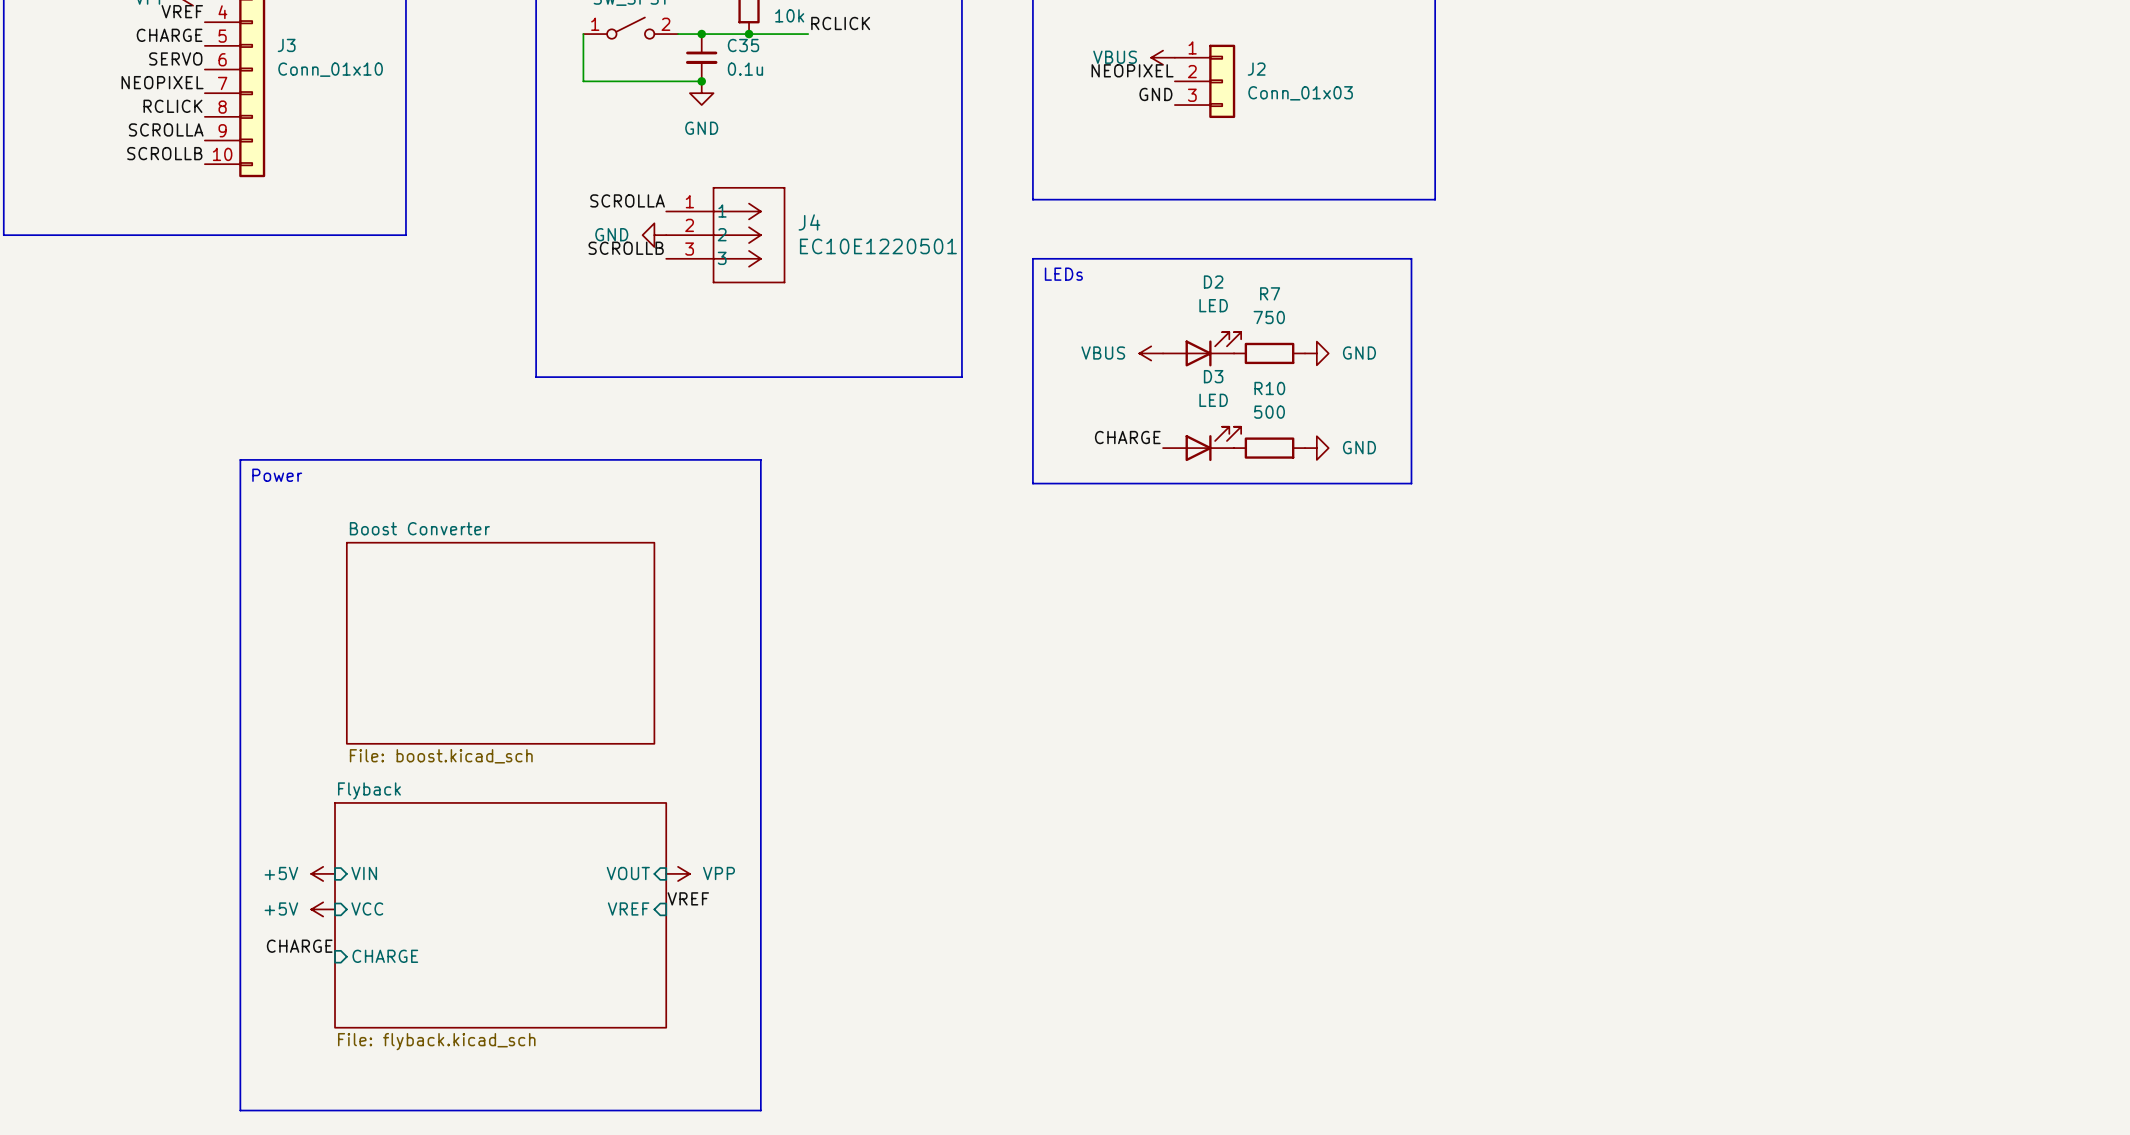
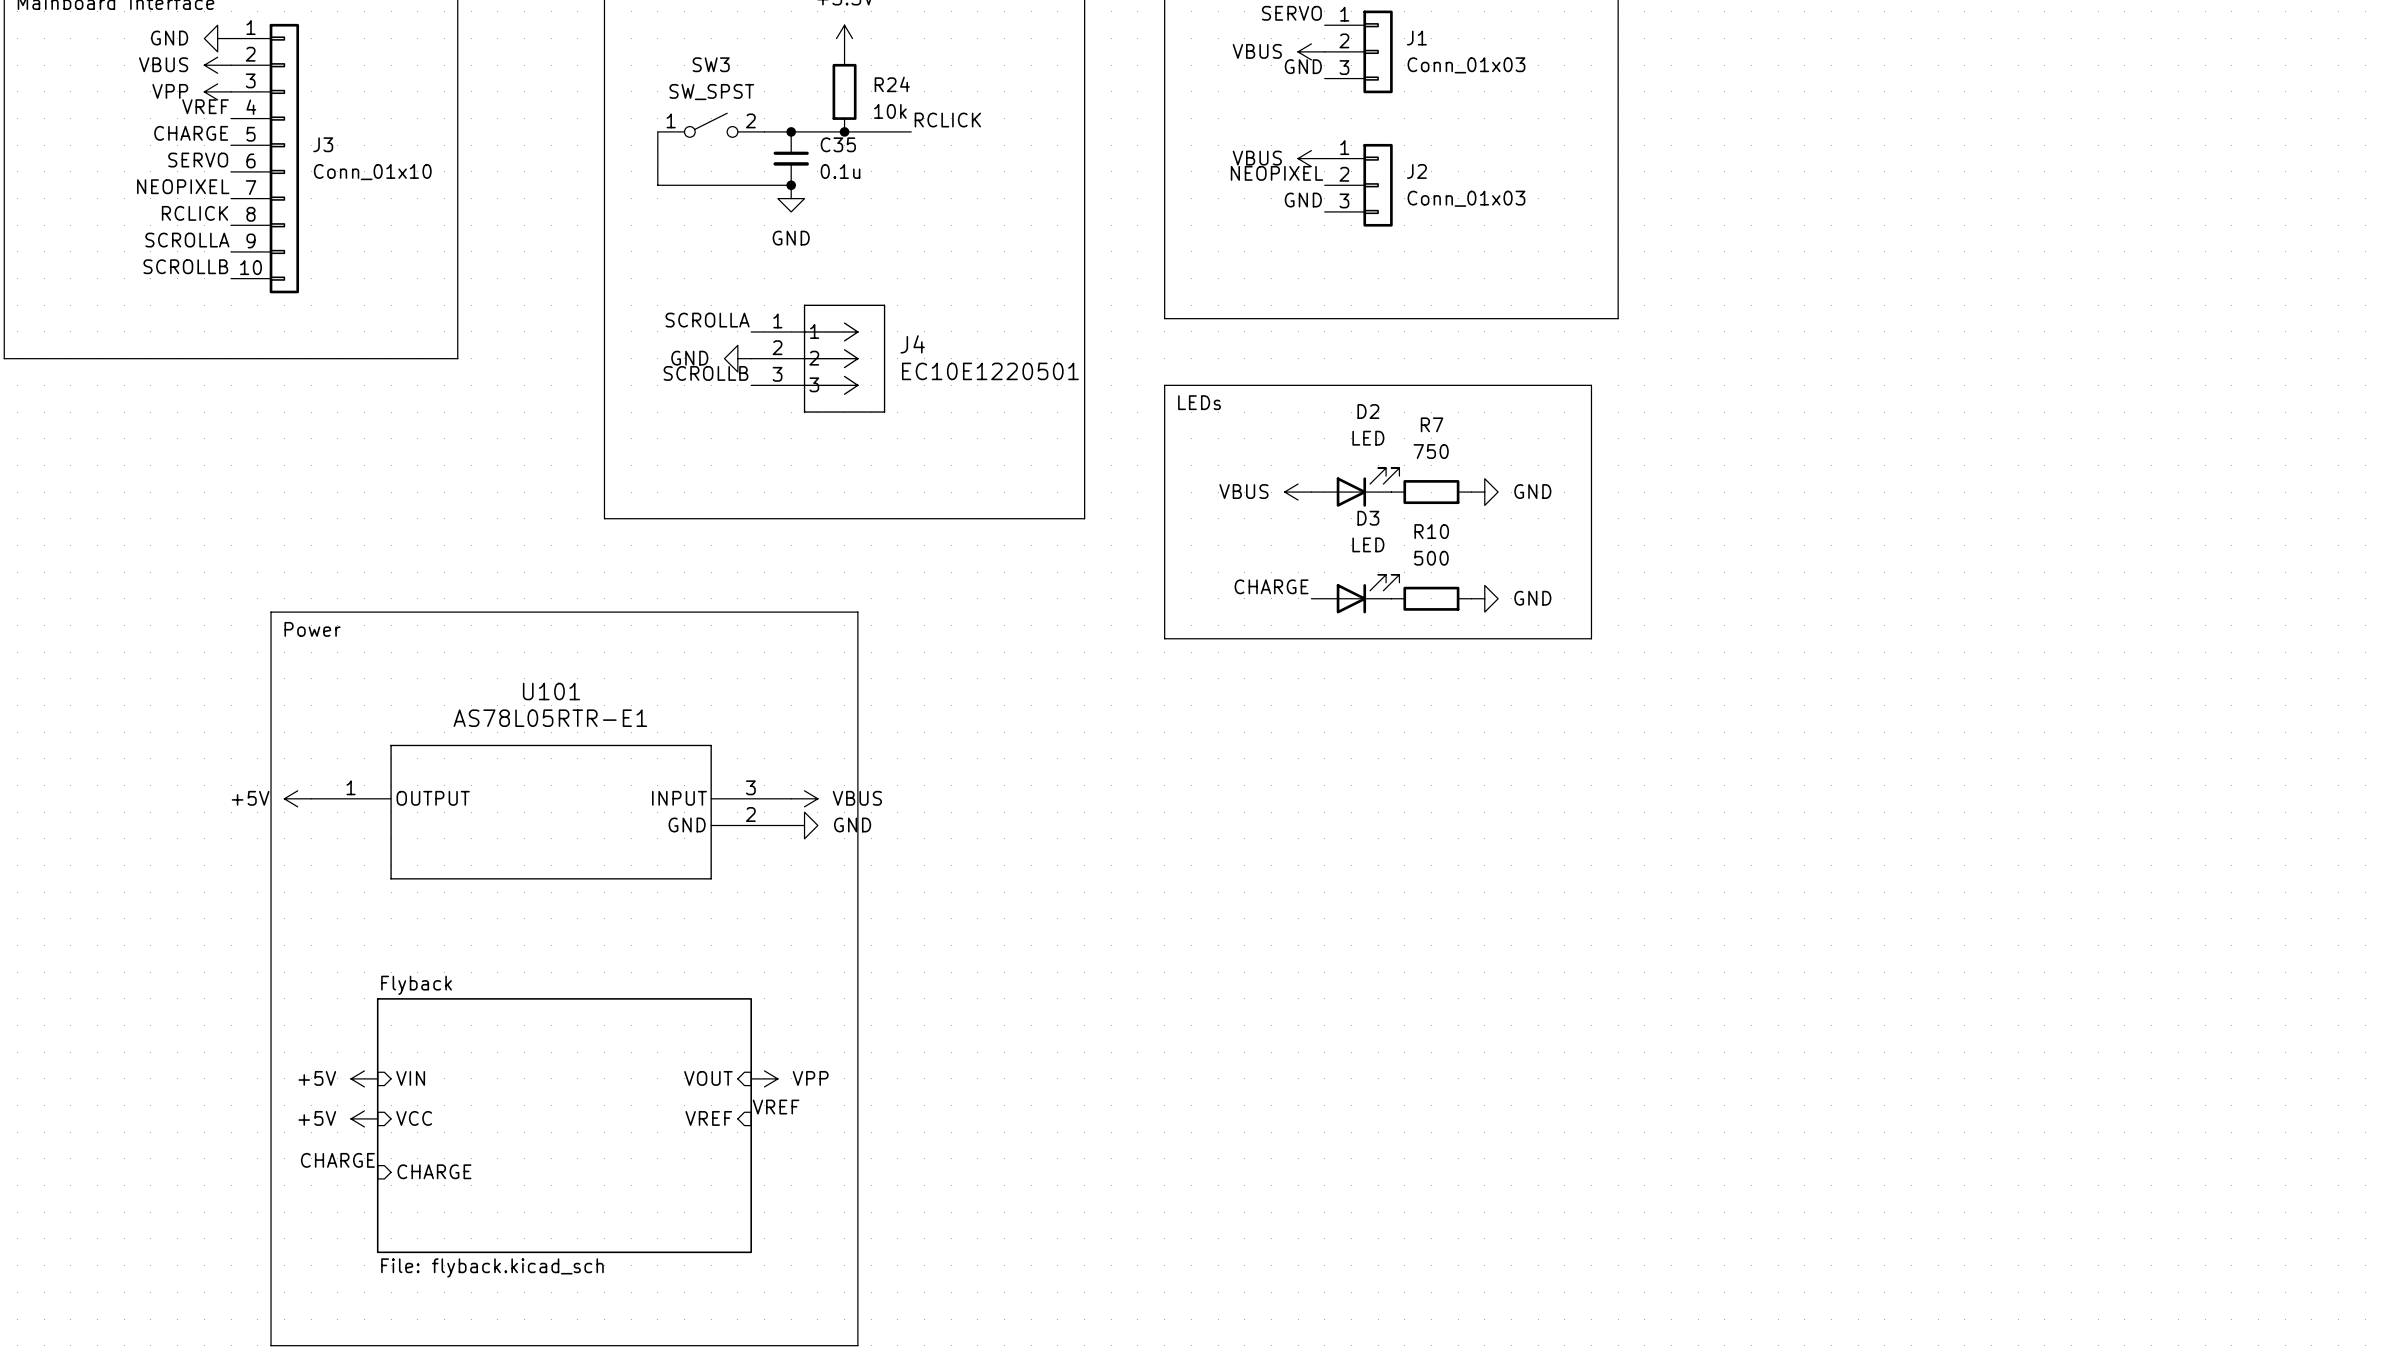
power symbol: none -> +5V (297, 798)
power symbol: none -> VBUS (804, 798)
U101: none -> AS78L05RTR-E1 (551, 812)
sheet Boost Converter: File: boost.kicad_sch (500, 643) -> none
power symbol: none -> GND (804, 825)

